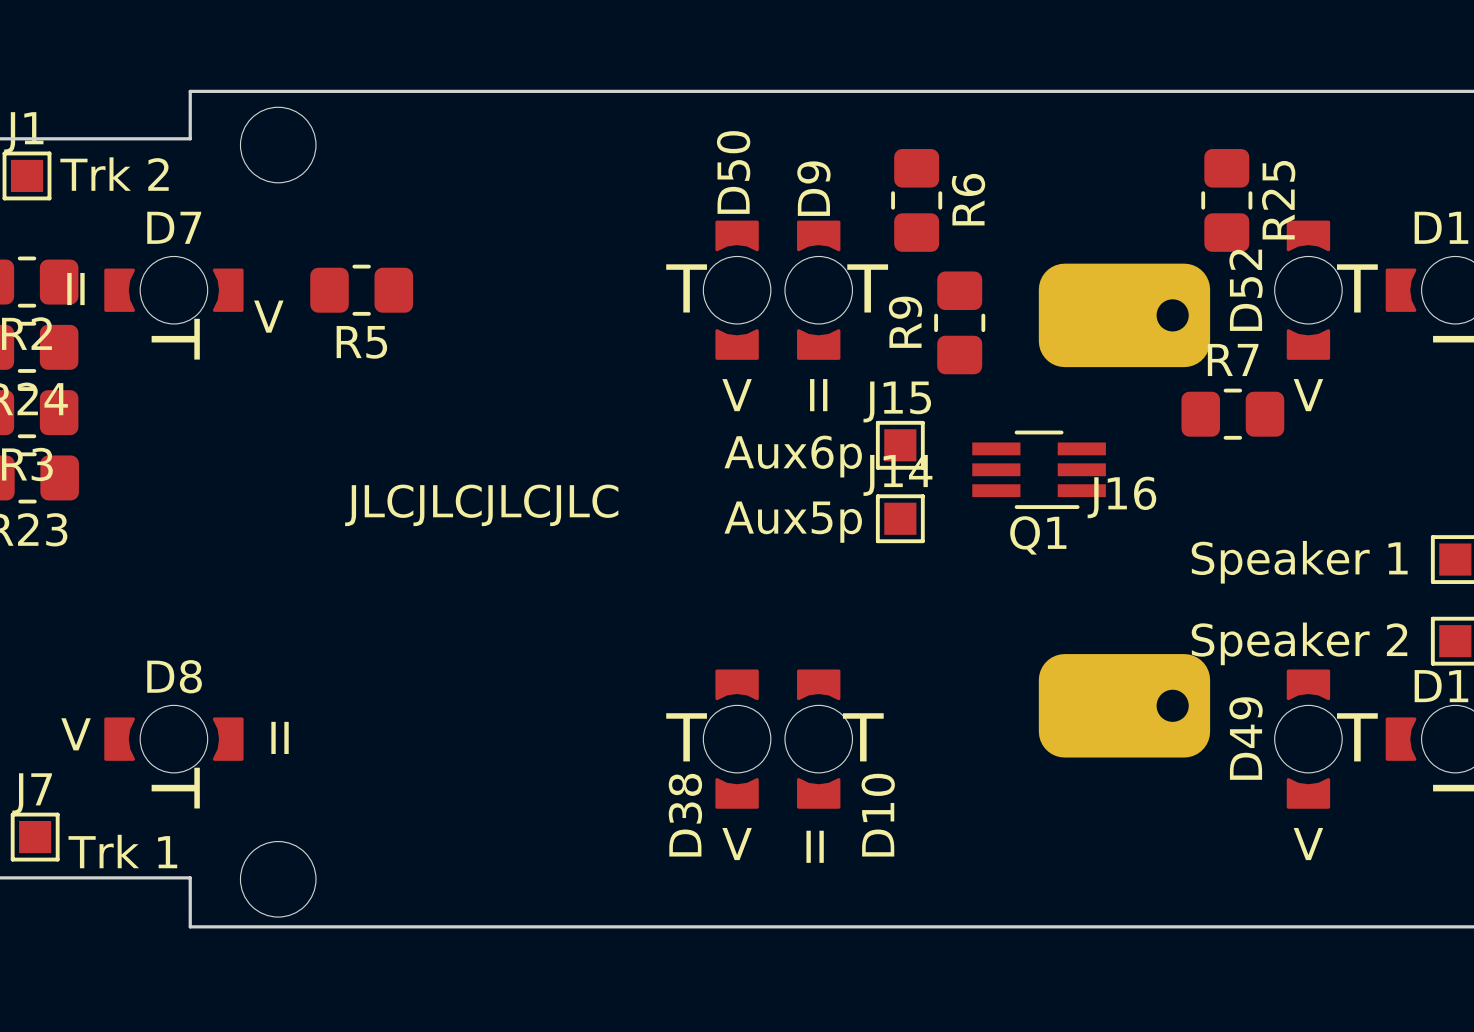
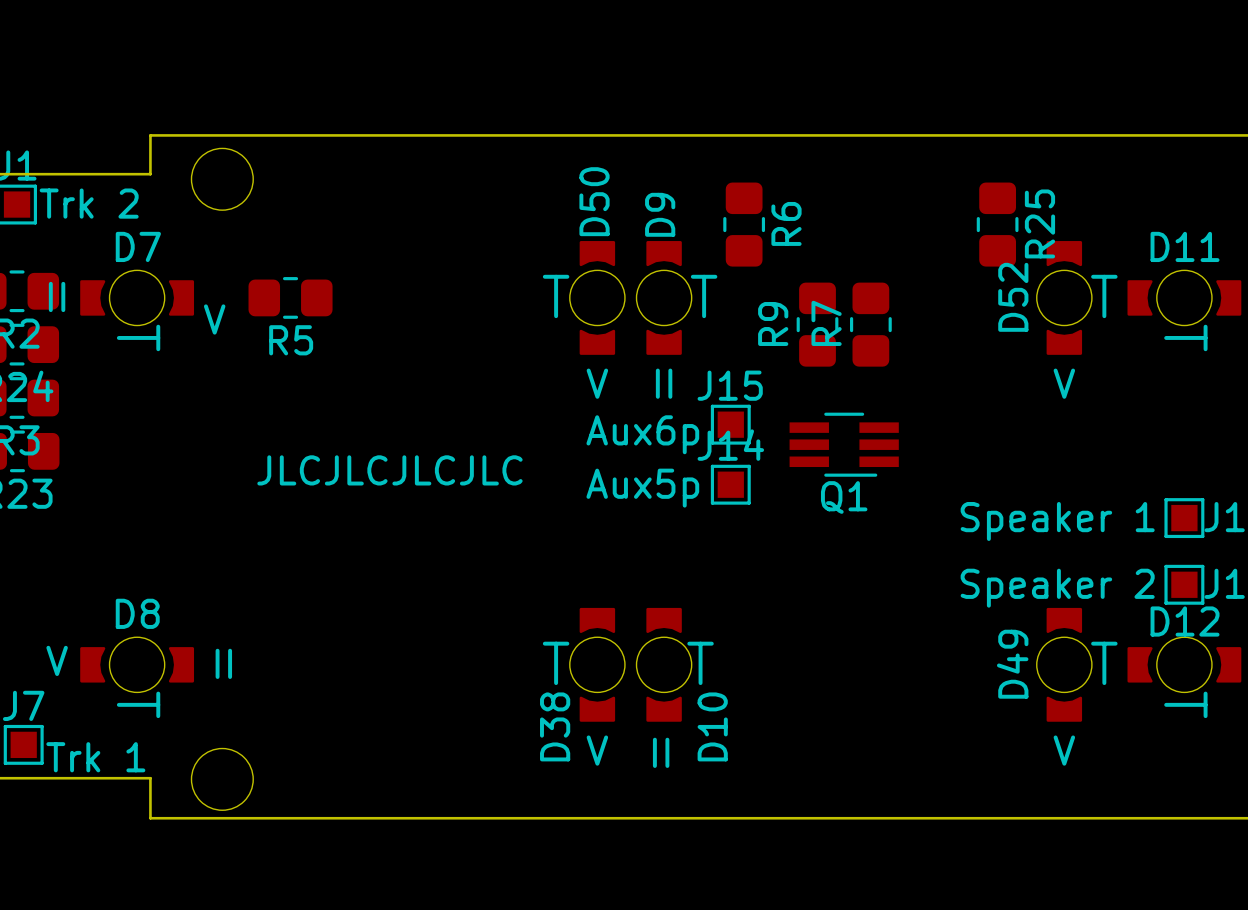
R9 position: (959, 322) -> (817, 324)
R7 name position: R7 (1233, 359) -> R7 (826, 323)
R7 rotation: 0° (1232, 414) -> 90° clockwise (870, 324)
R7 position: (1232, 414) -> (870, 324)
J16: (1124, 510) -> none

